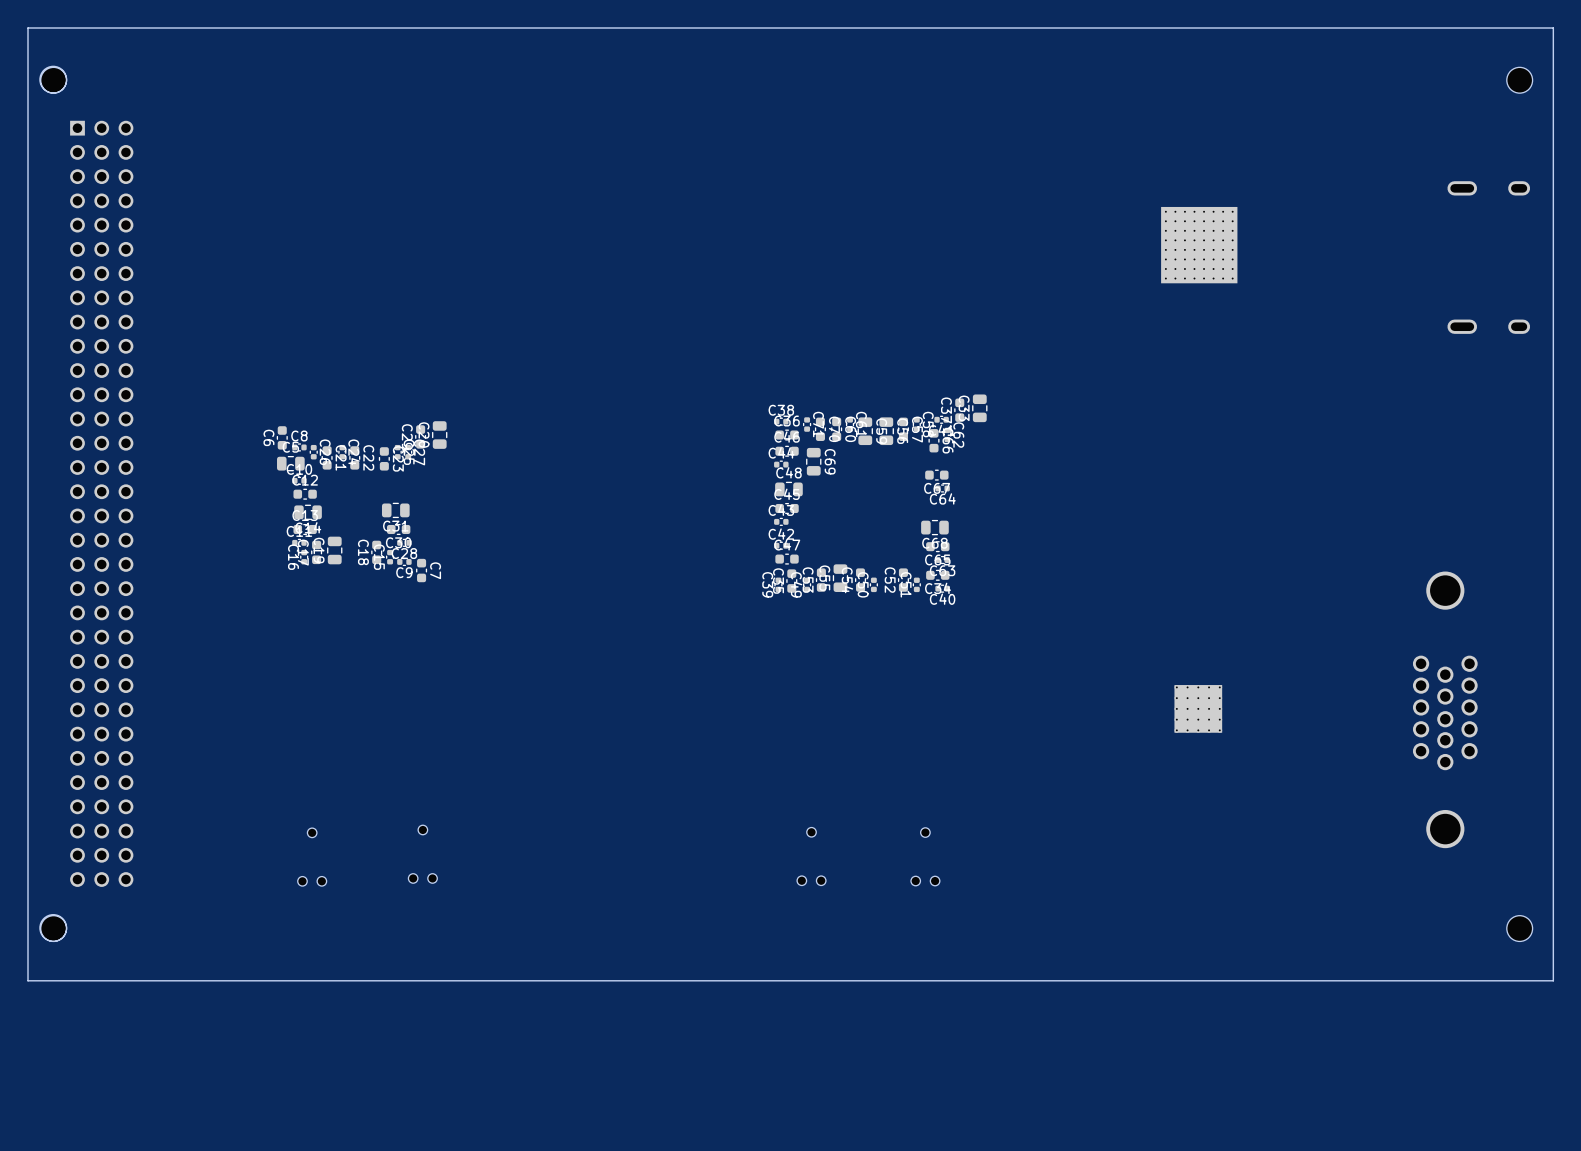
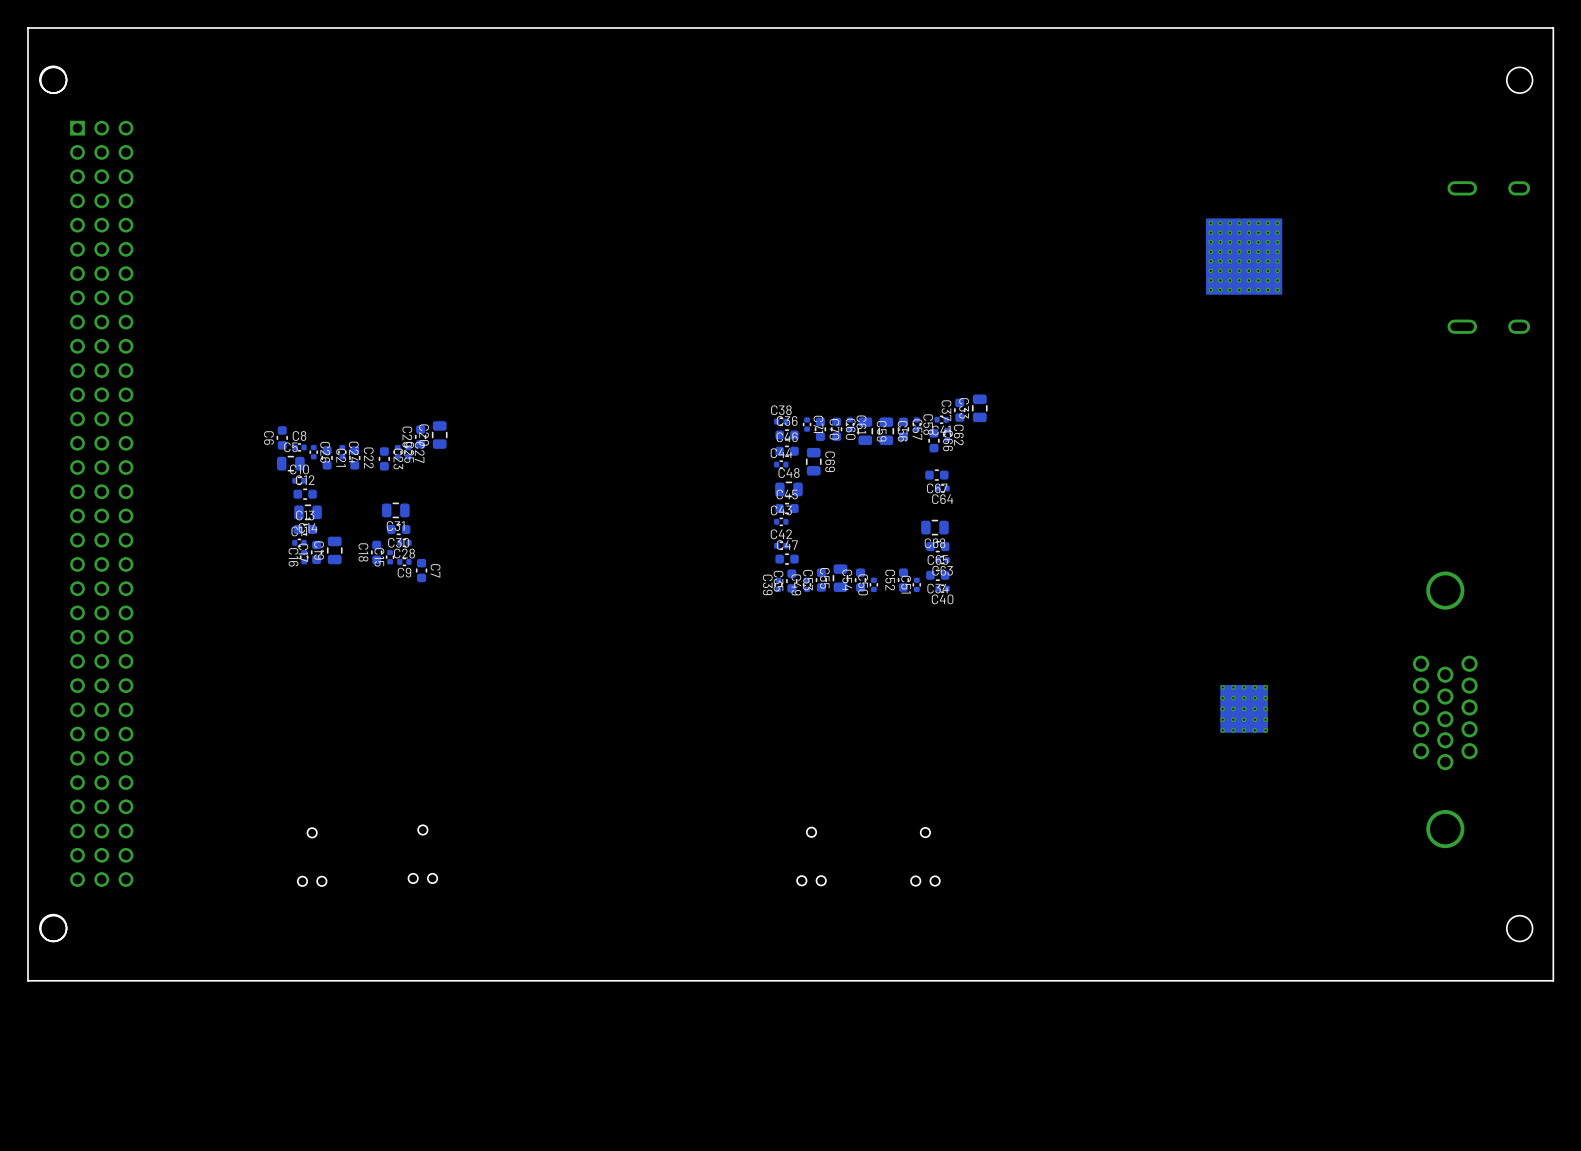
part position: (1199, 245) -> (1244, 256)
part position: (1198, 708) -> (1244, 708)

